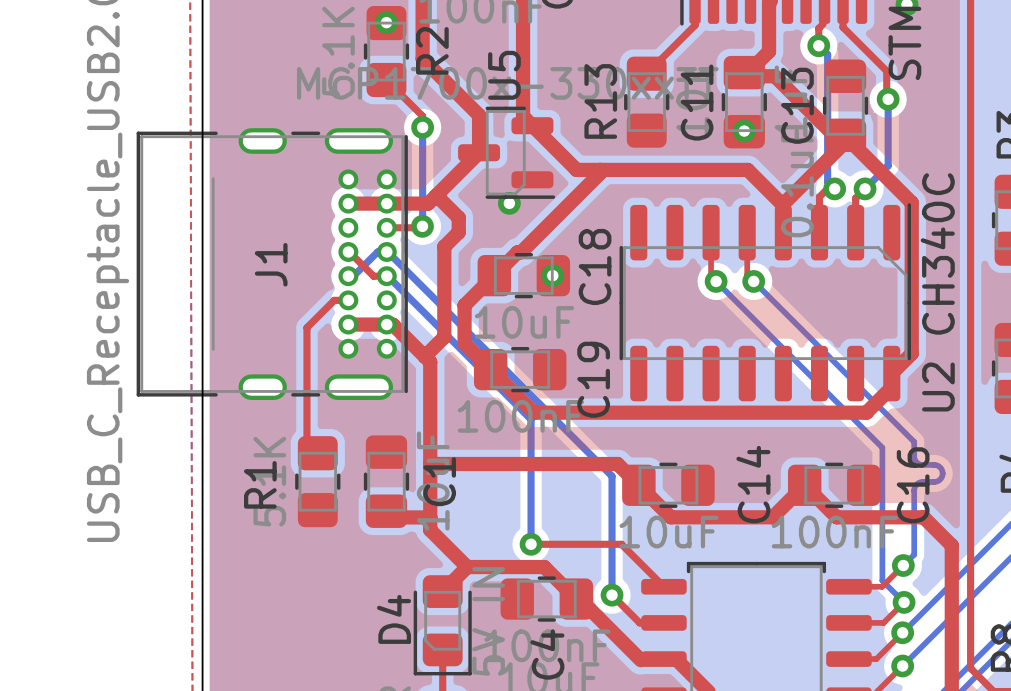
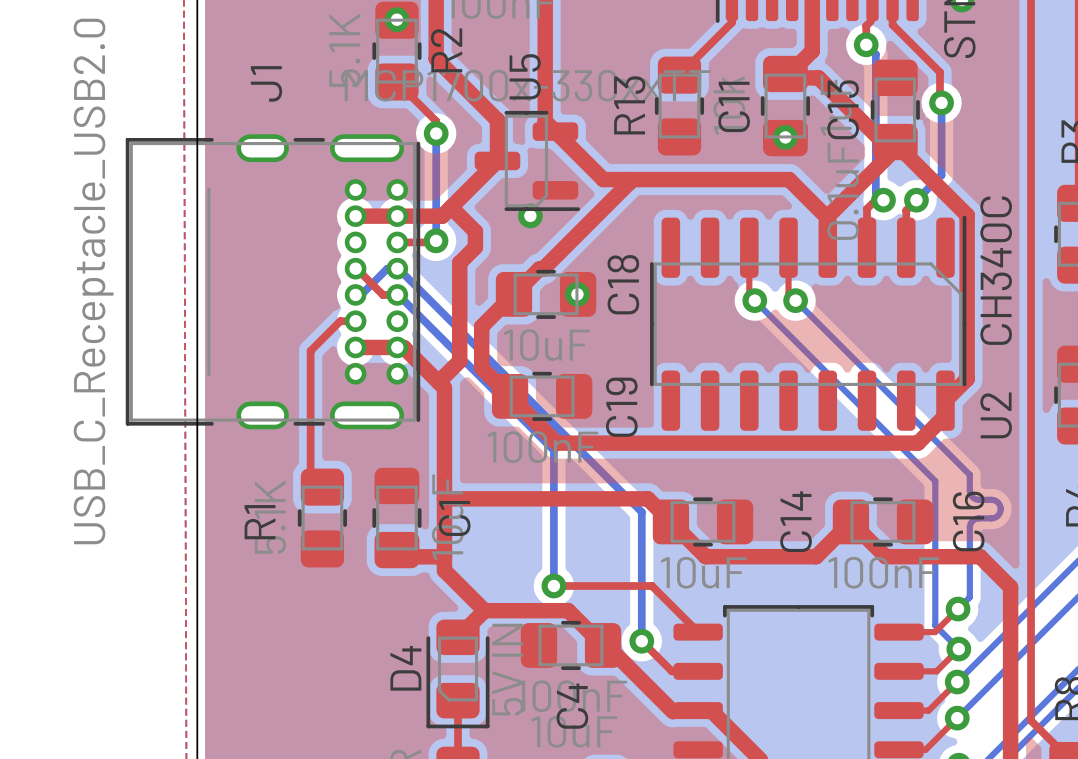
J1 name position: J1 (271, 264) -> J1 (266, 83)

